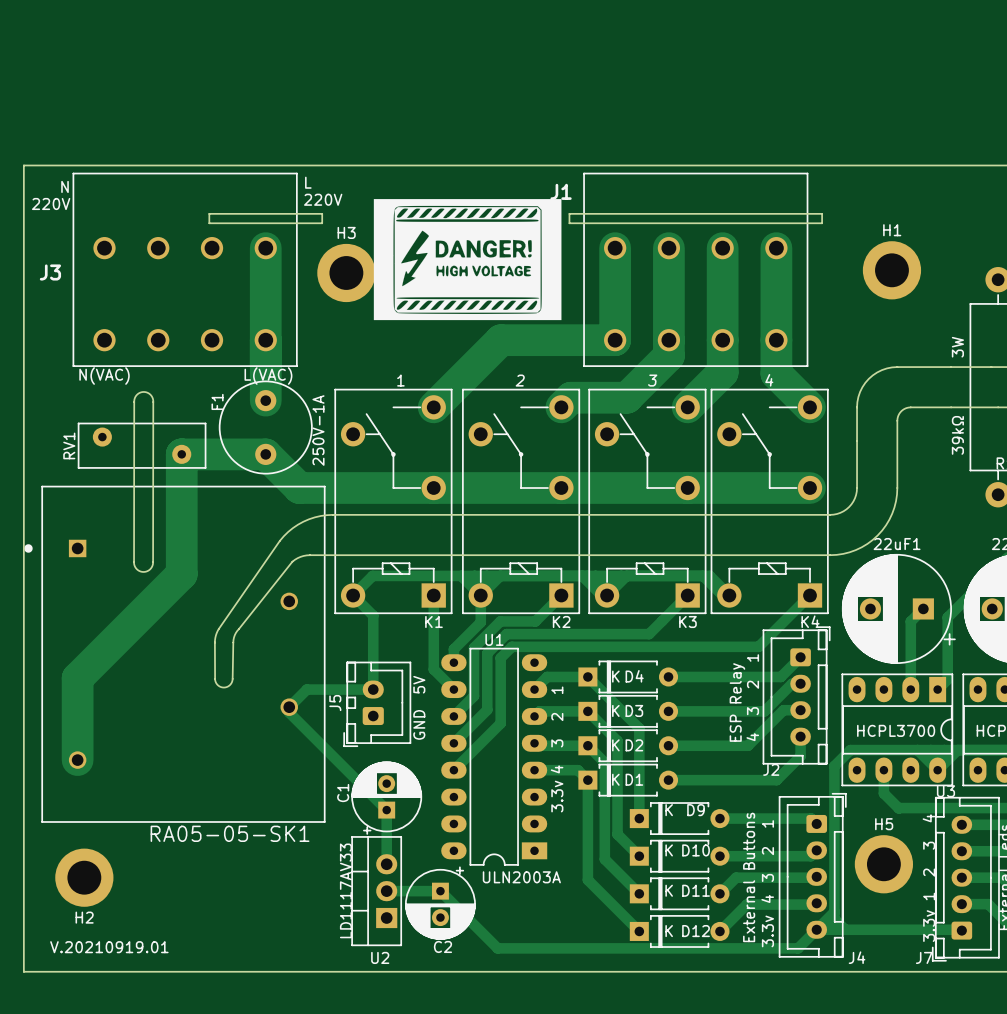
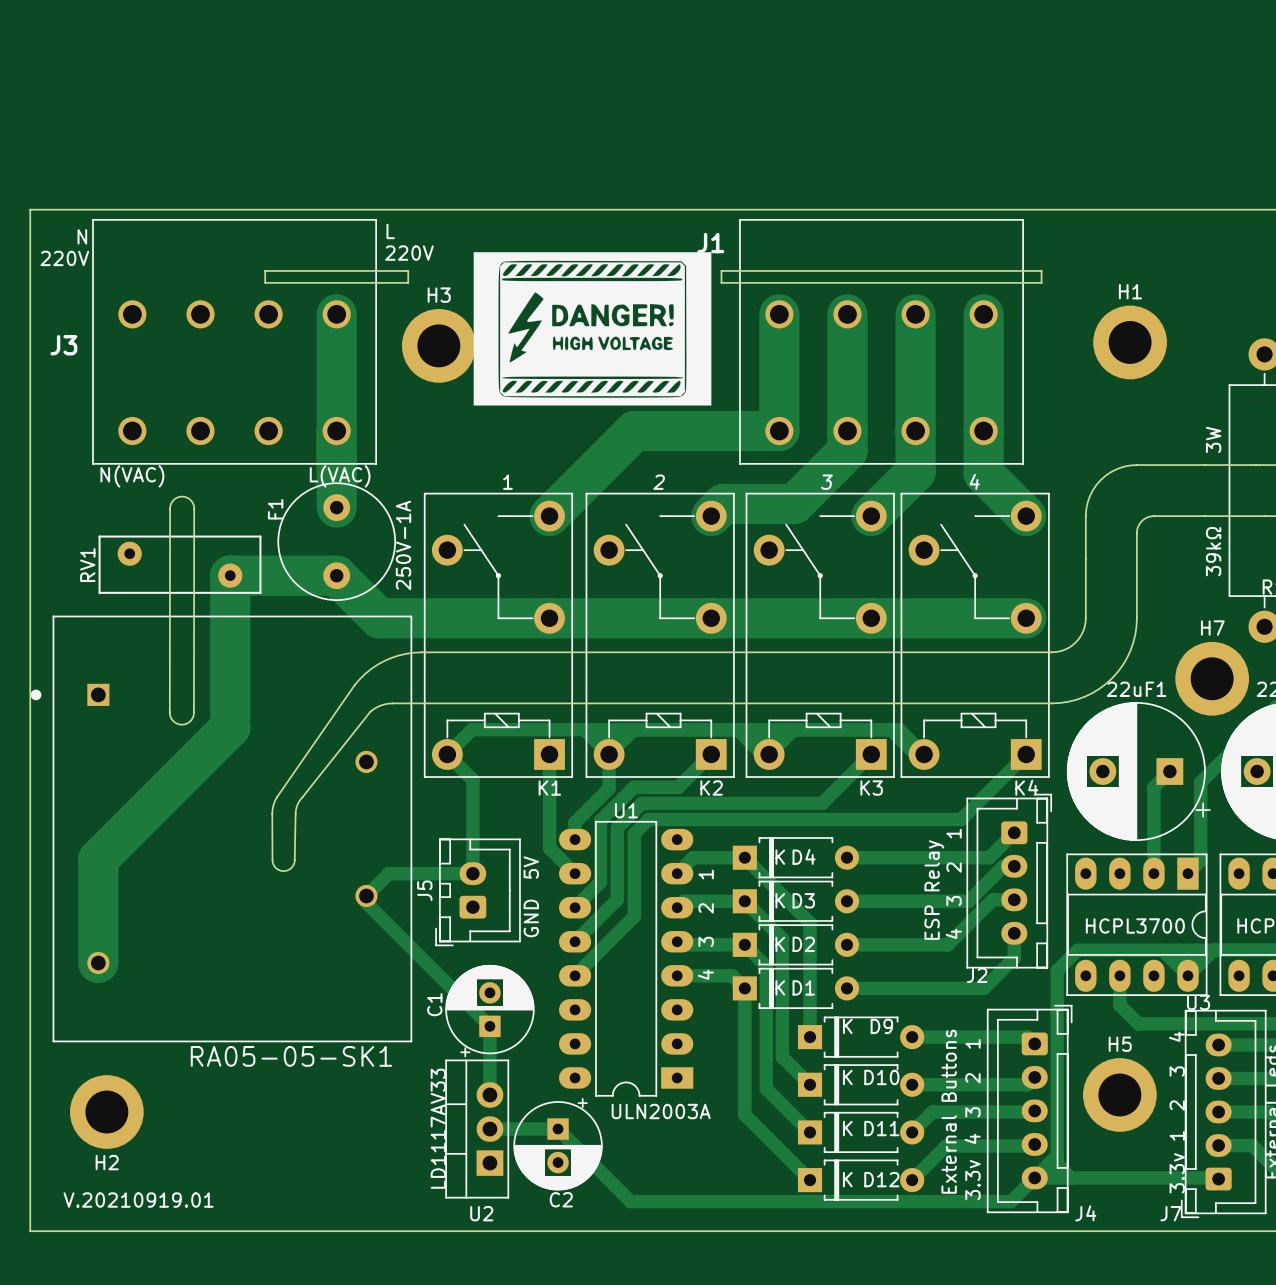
H7: none -> (1212, 678)
text: 3.3v (557, 796) -> none

